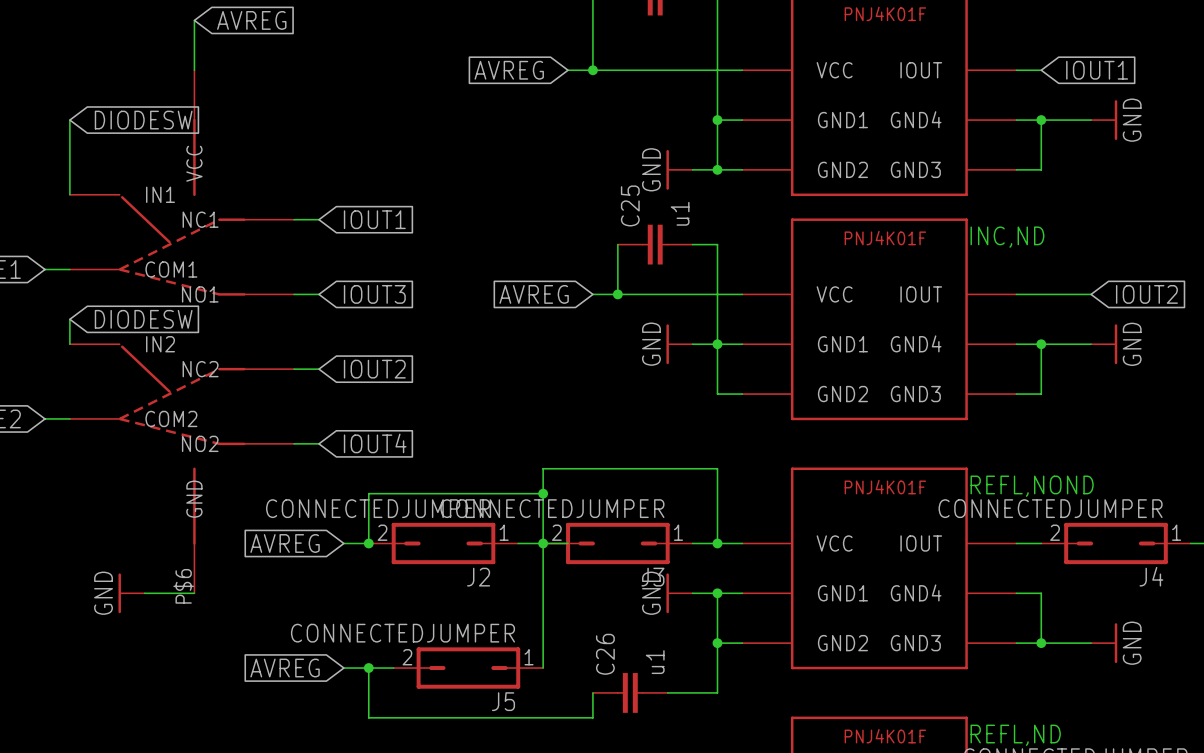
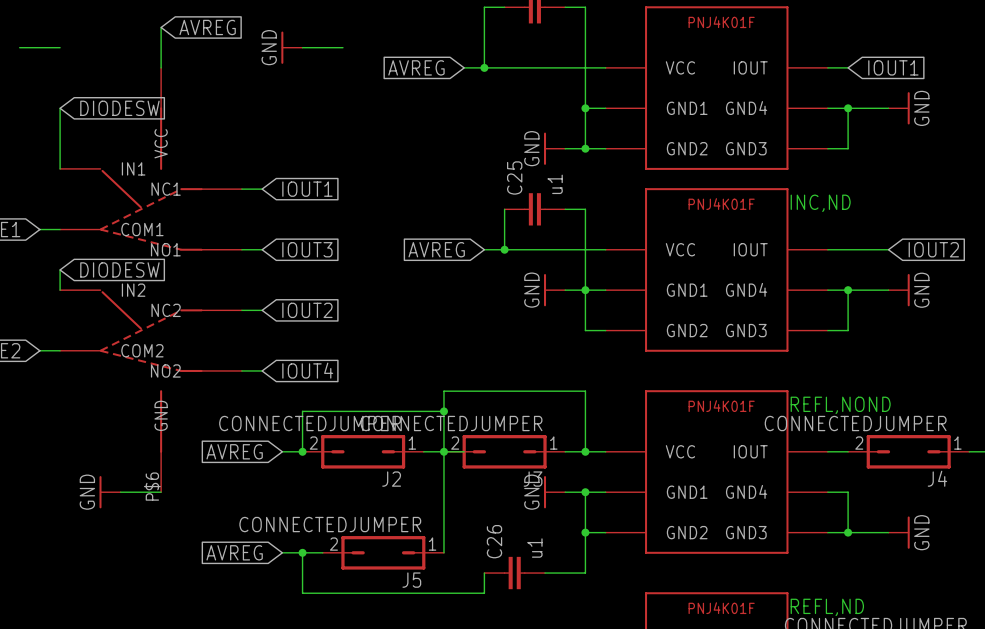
wire: none -> (19, 47) (60, 47)
power symbol: none -> GND (291, 47)
wire: none -> (302, 47) (342, 47)

